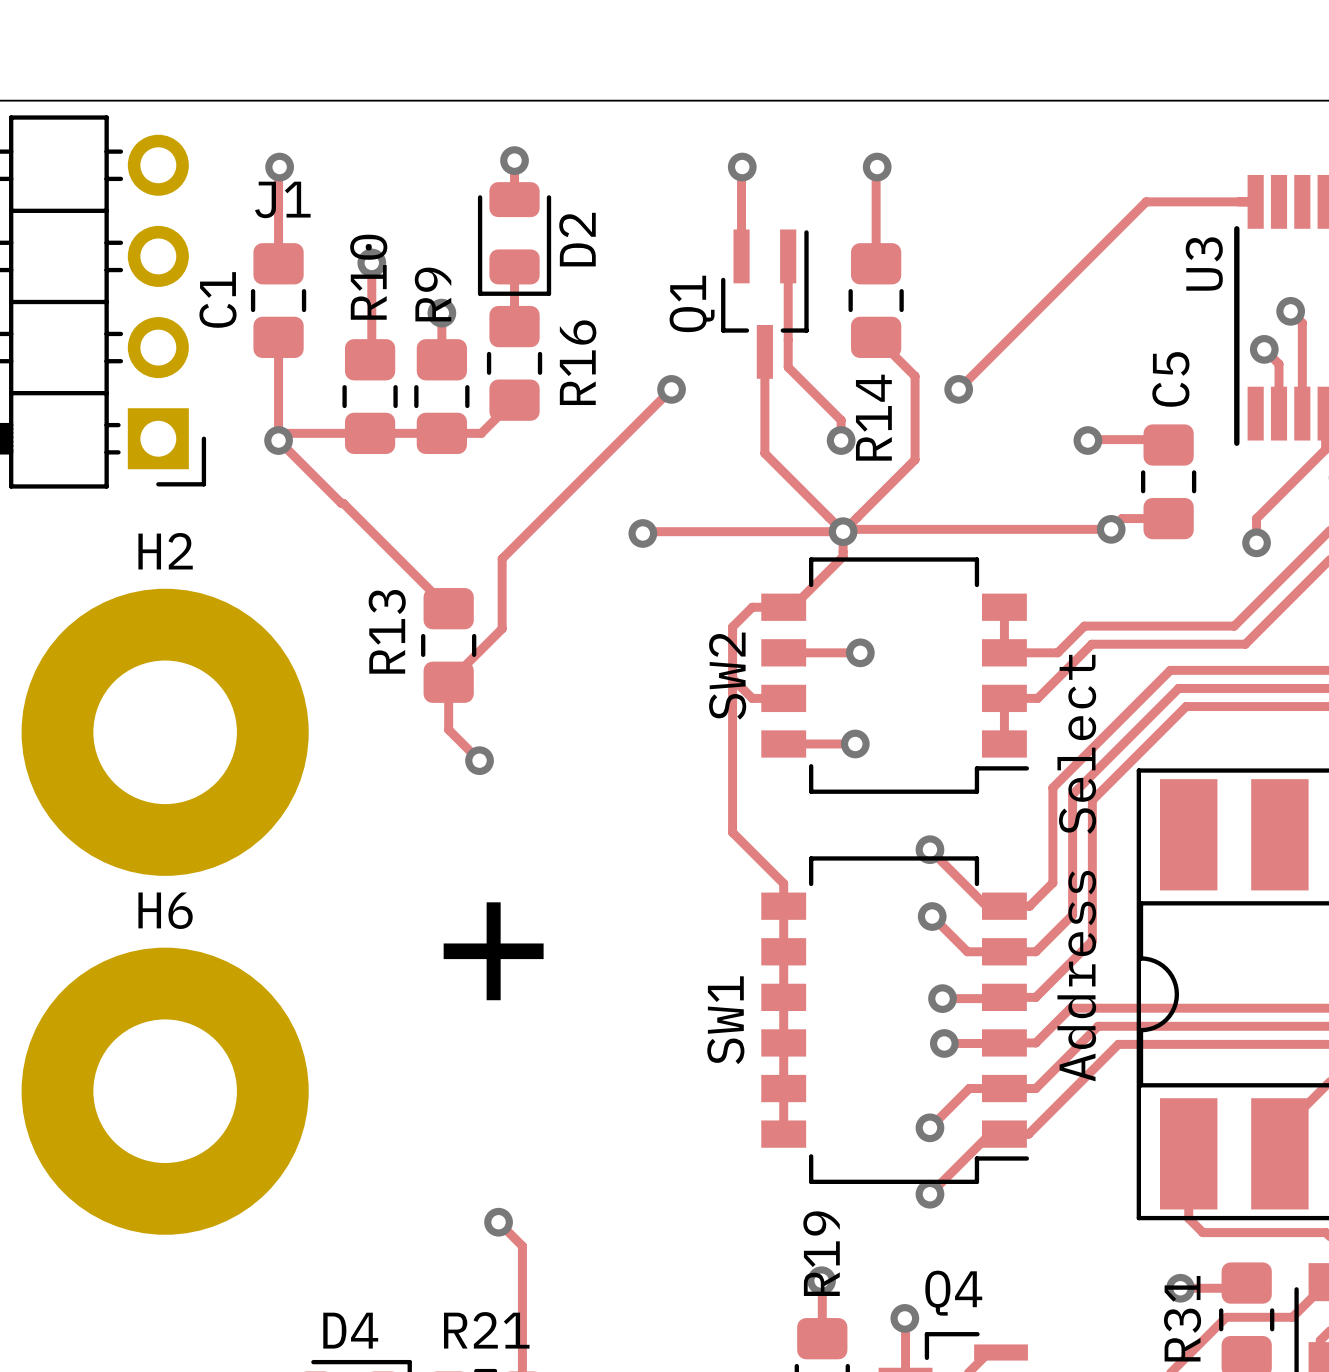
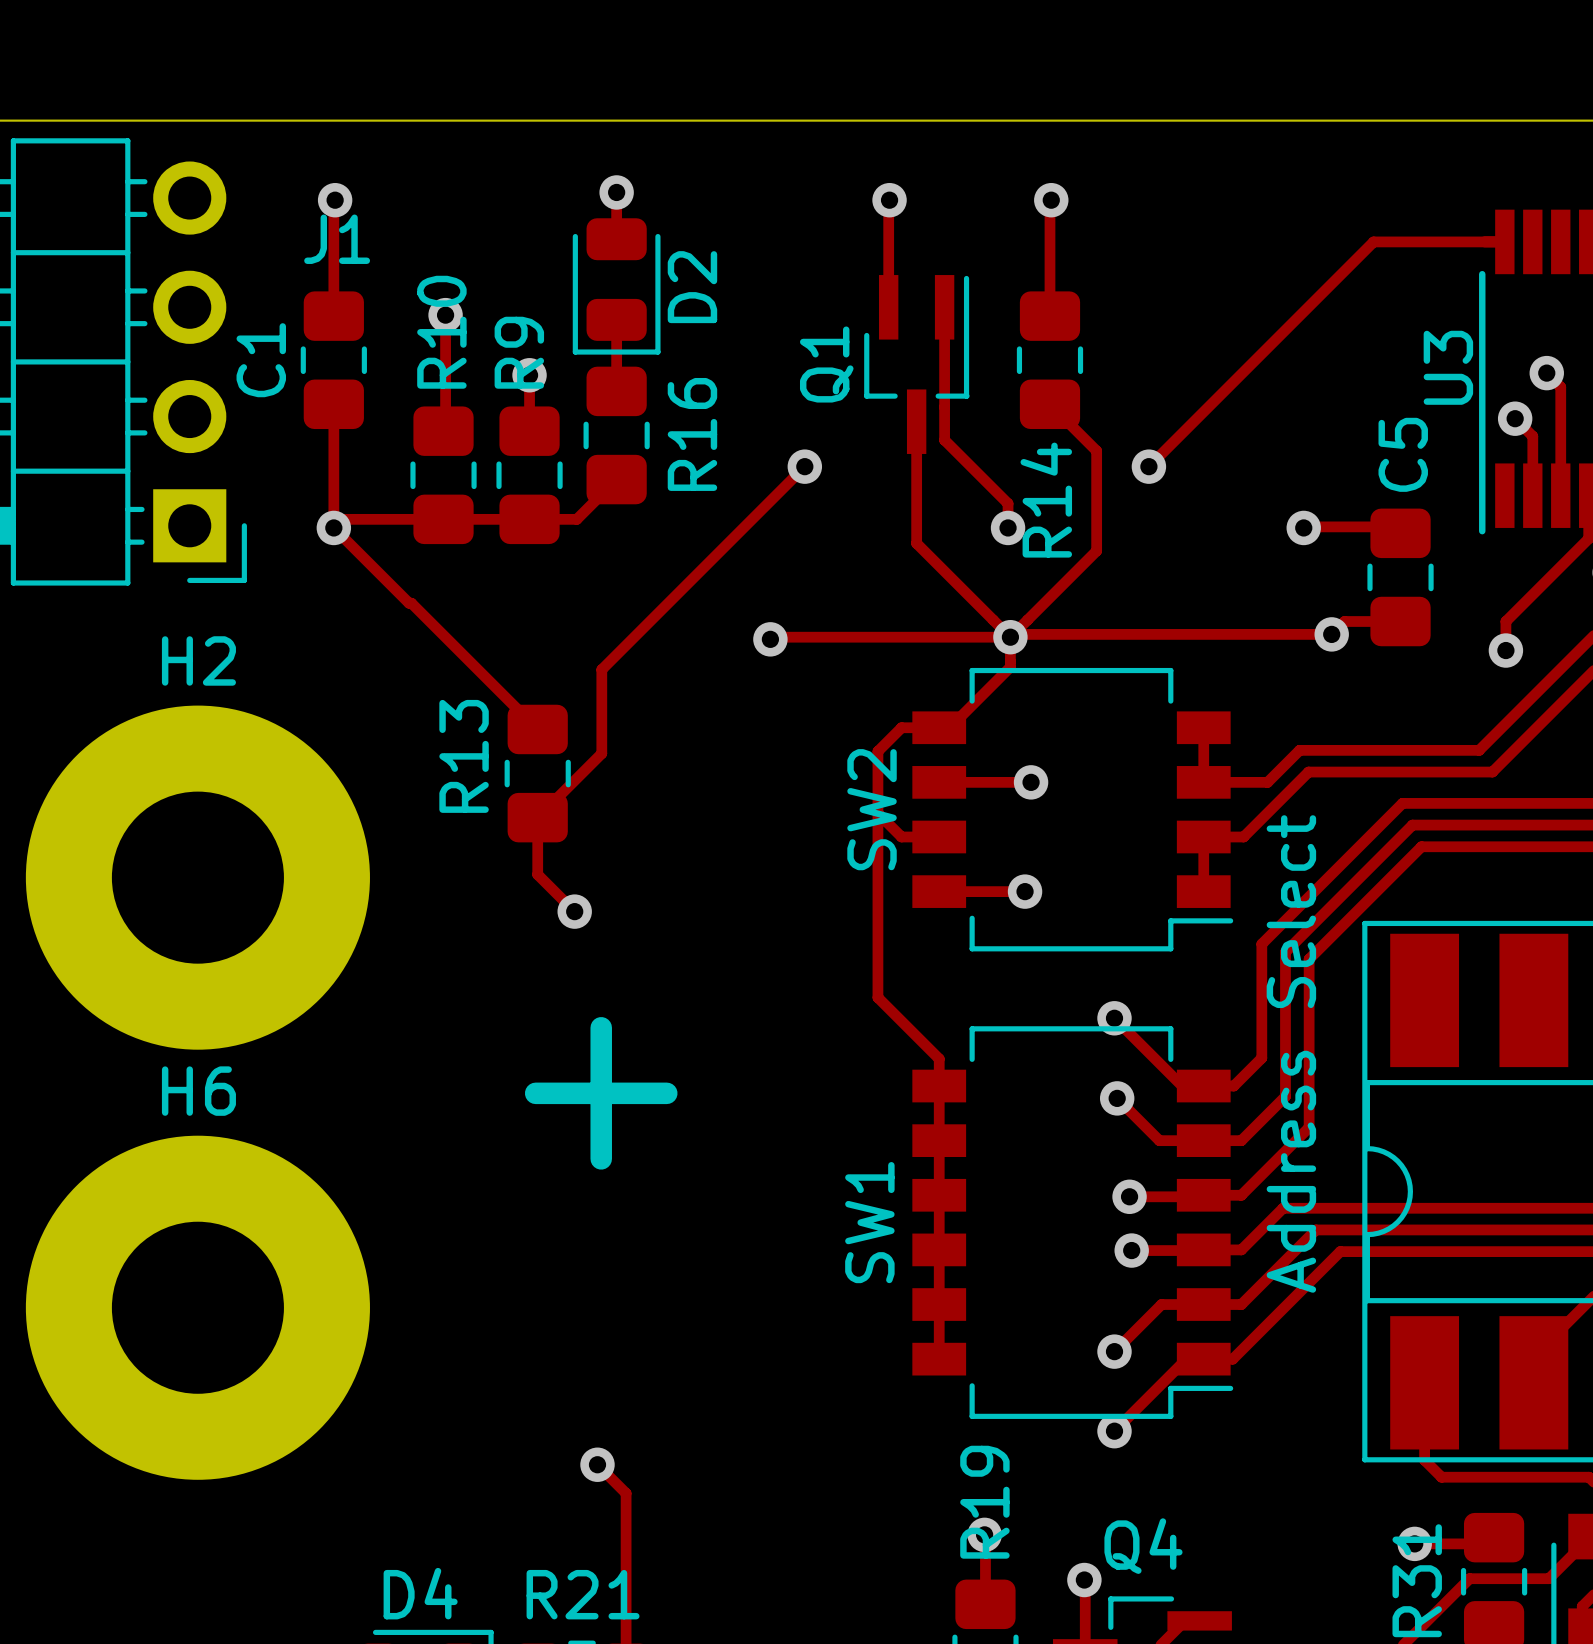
U3 name position: U3 (1204, 264) -> U3 (1448, 367)

